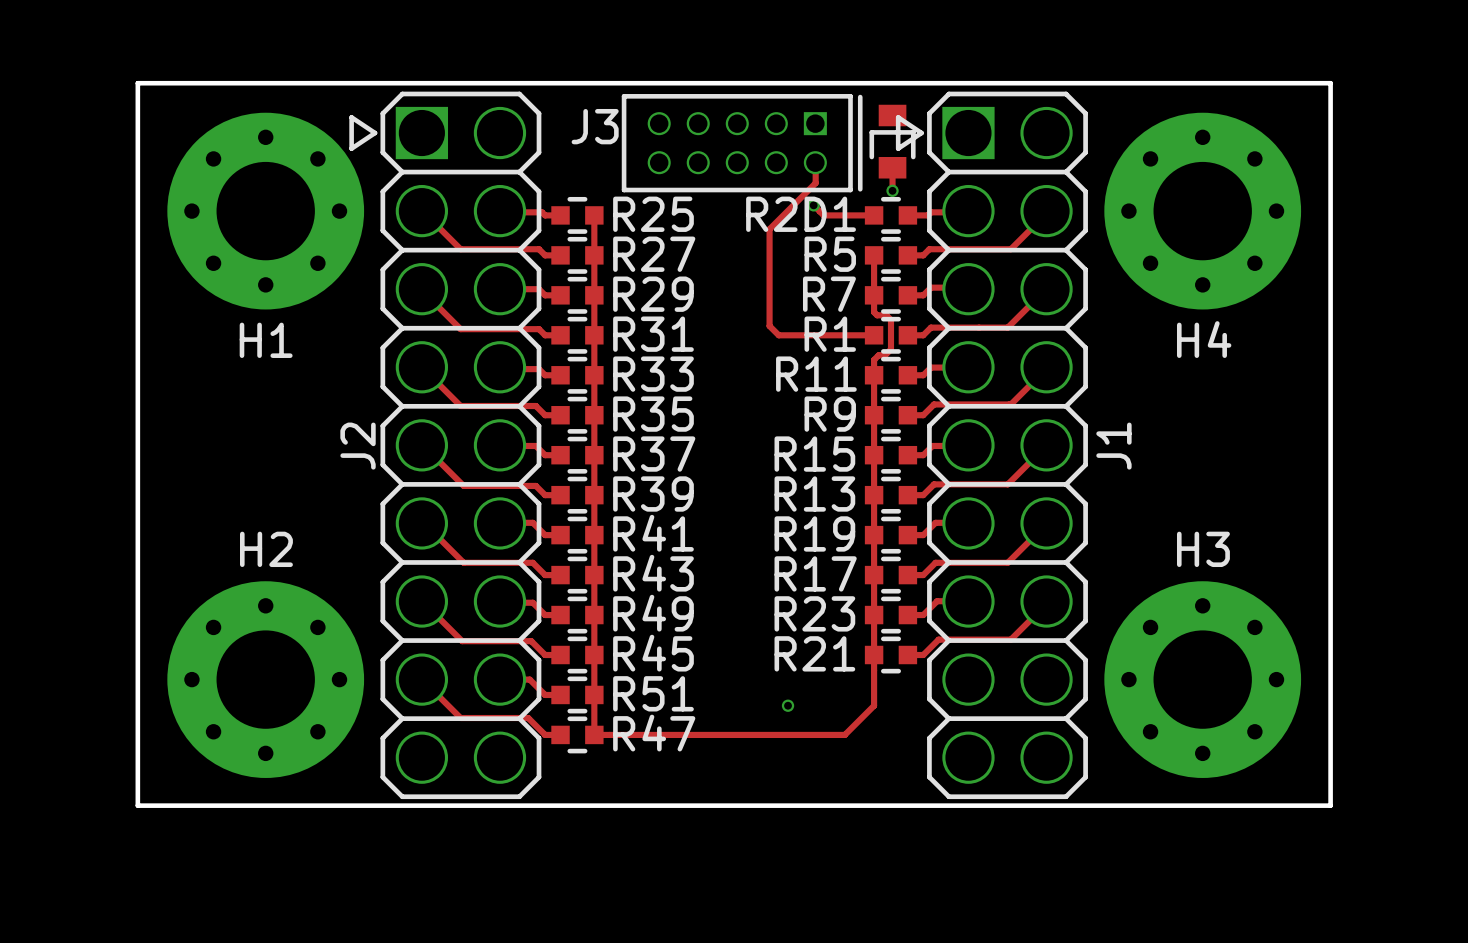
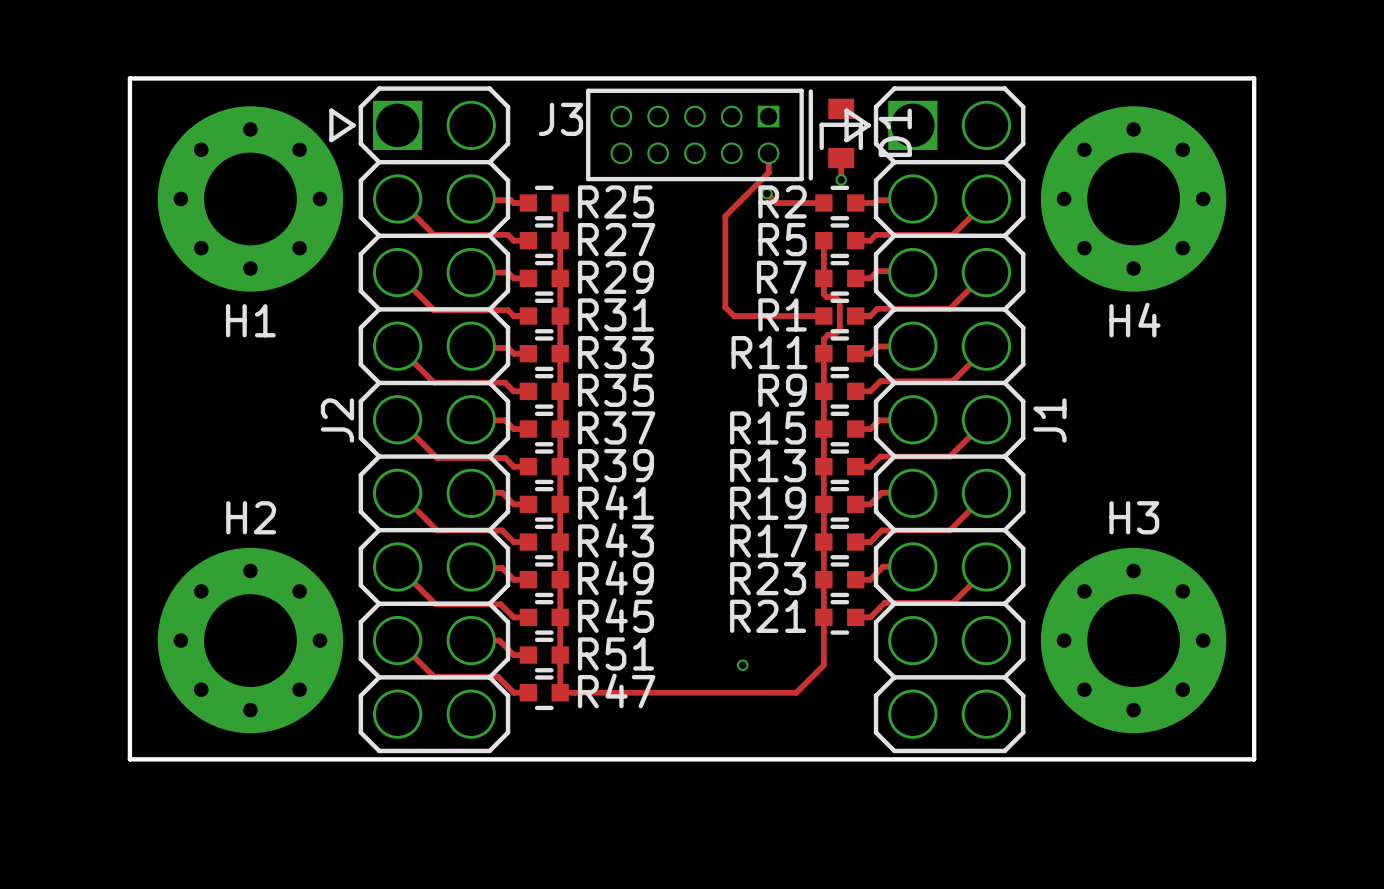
R2 name position: R2 (771, 214) -> R2 (782, 201)
D1 name rotation: 0° (830, 214) -> 90° counterclockwise (895, 132)
D1 name position: D1 (830, 214) -> D1 (895, 132)

